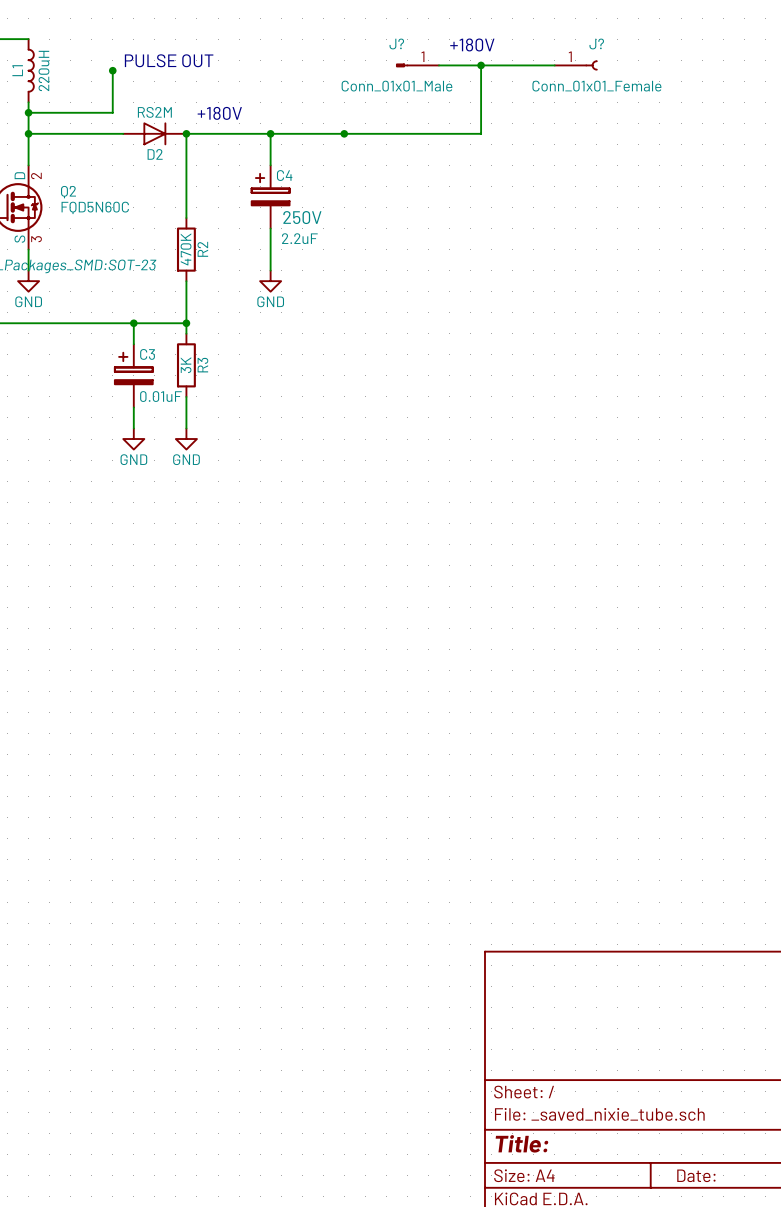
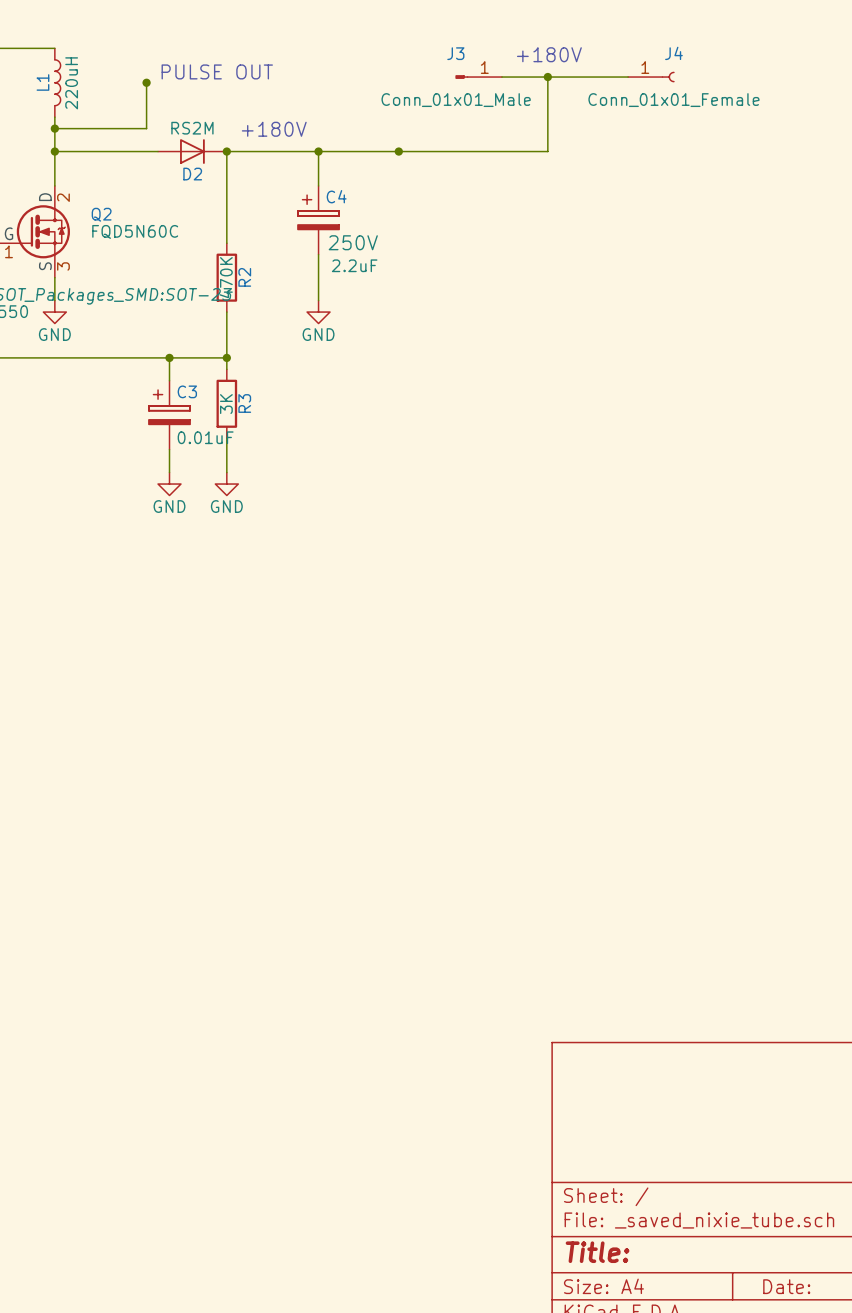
J? name: J? (396, 43) -> J3 (455, 53)
J? name: J? (596, 43) -> J4 (673, 53)

